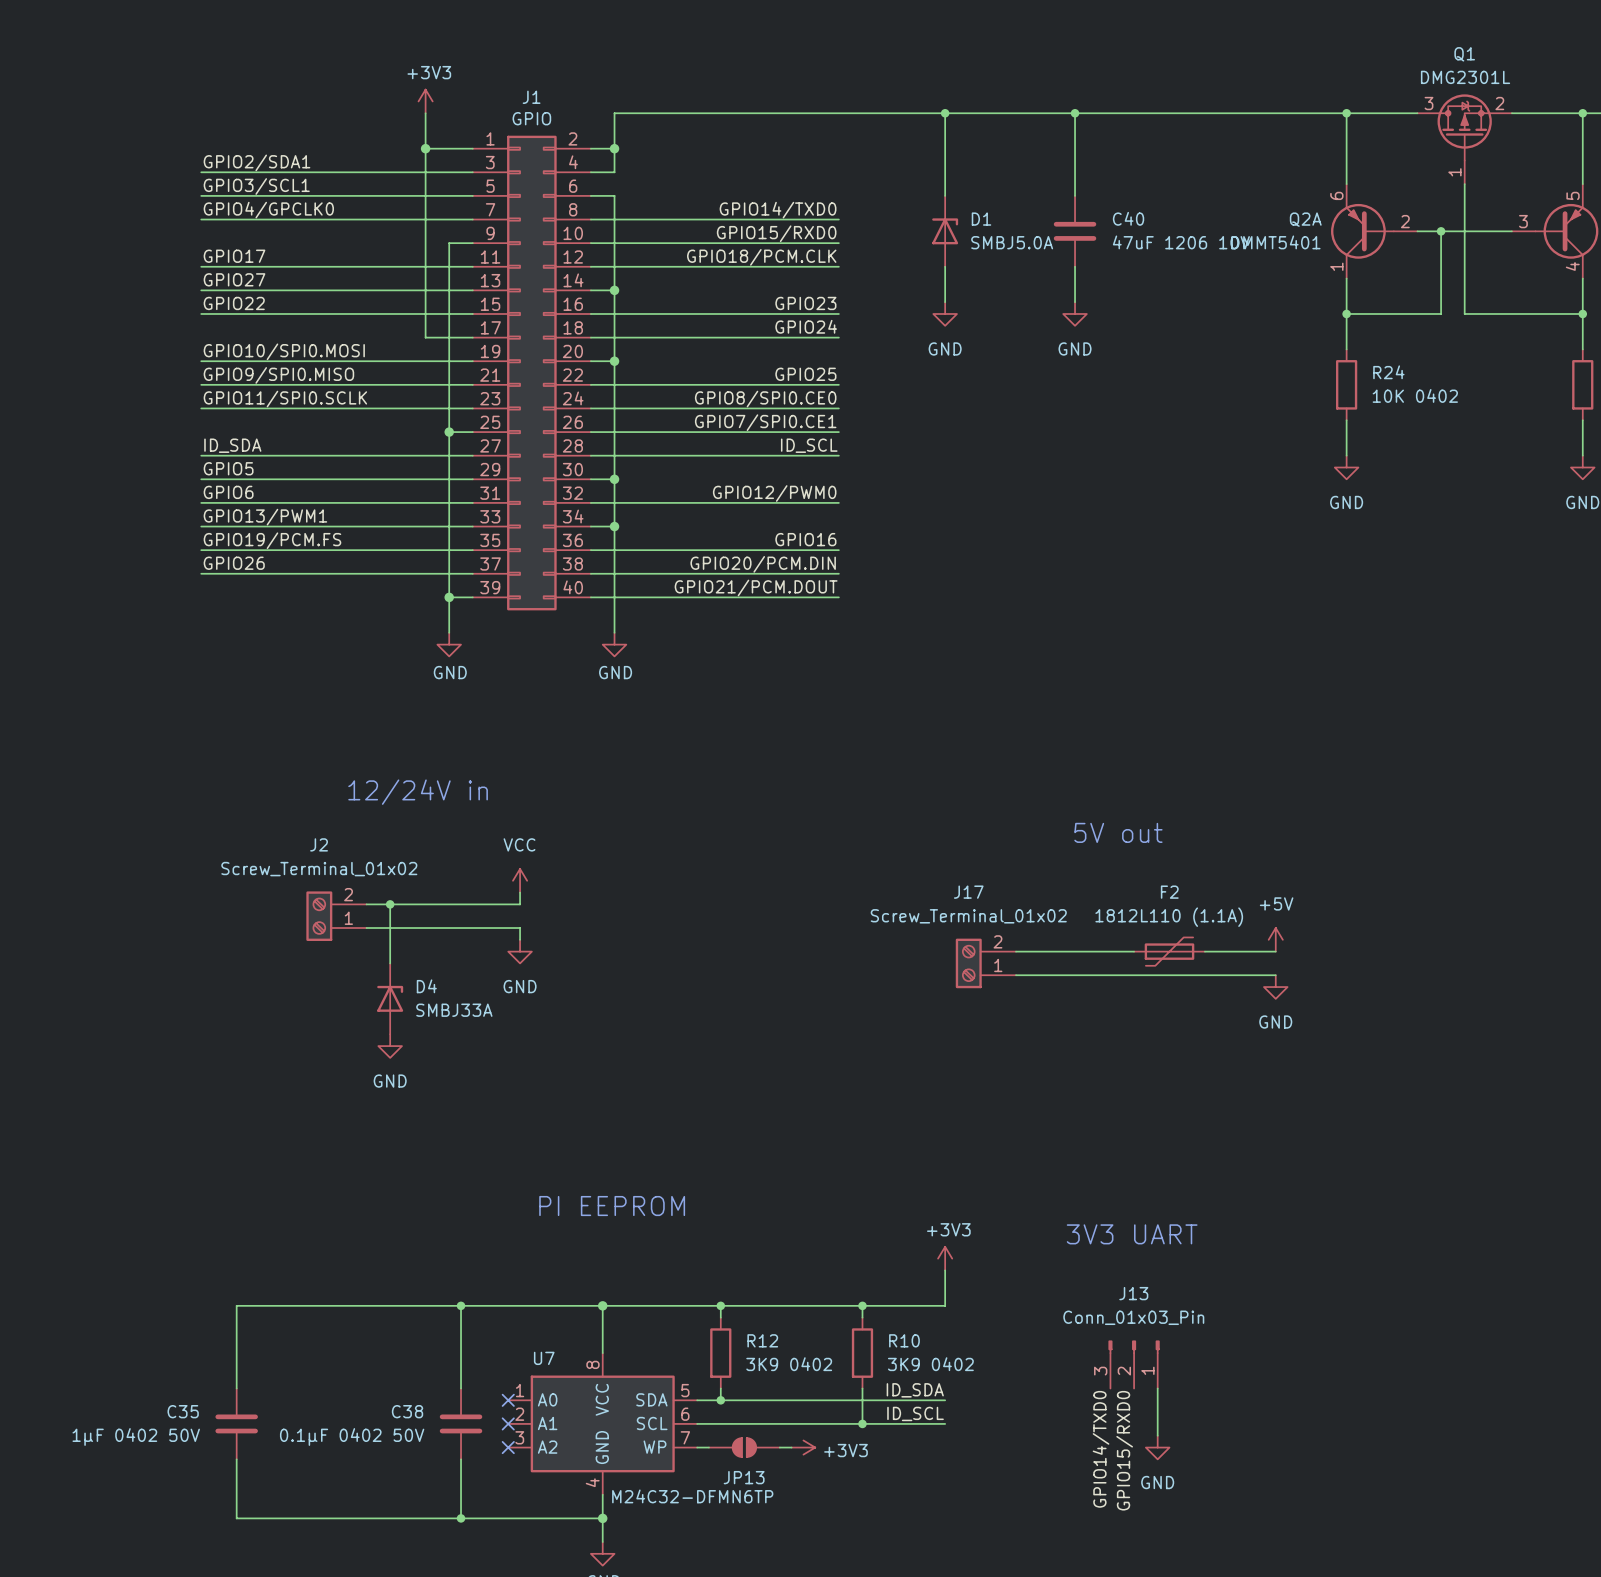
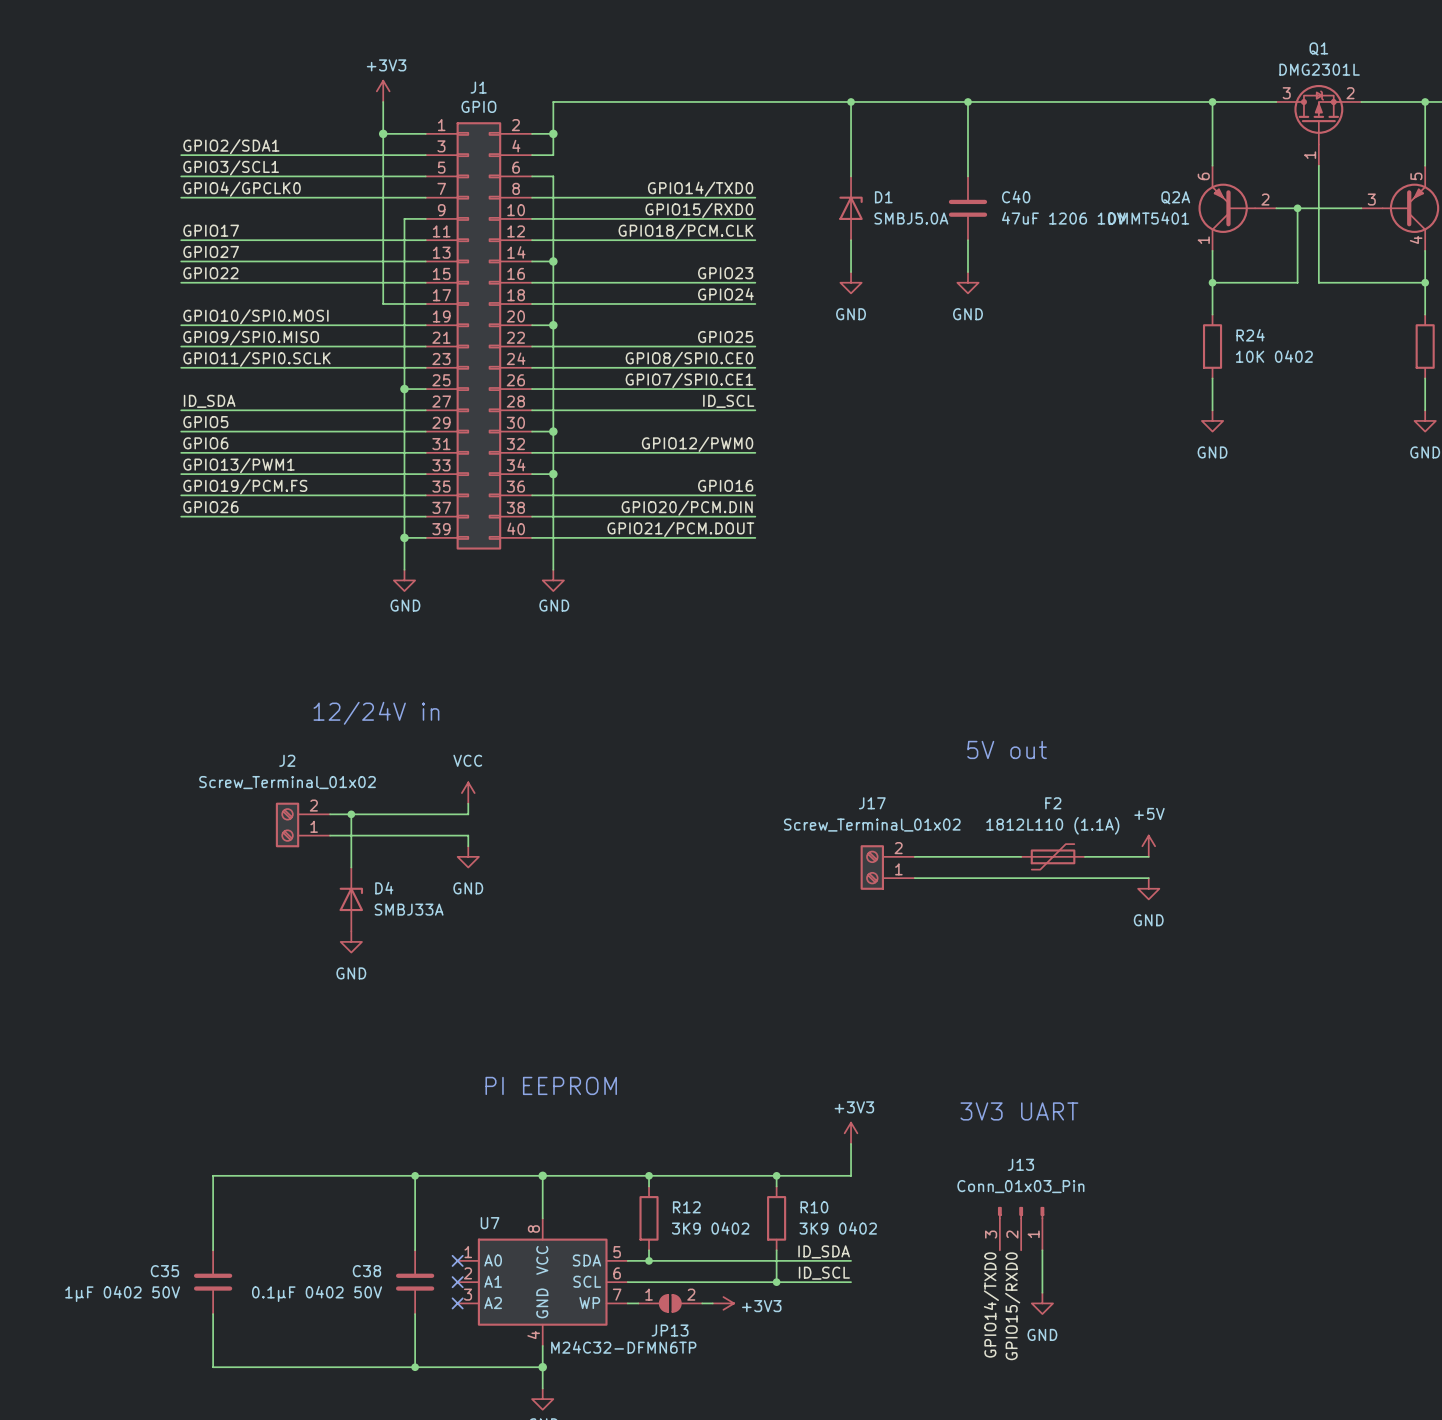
JP13 pin number: none -> 1 (649, 1294)
JP13 pin number: none -> 2 (691, 1294)

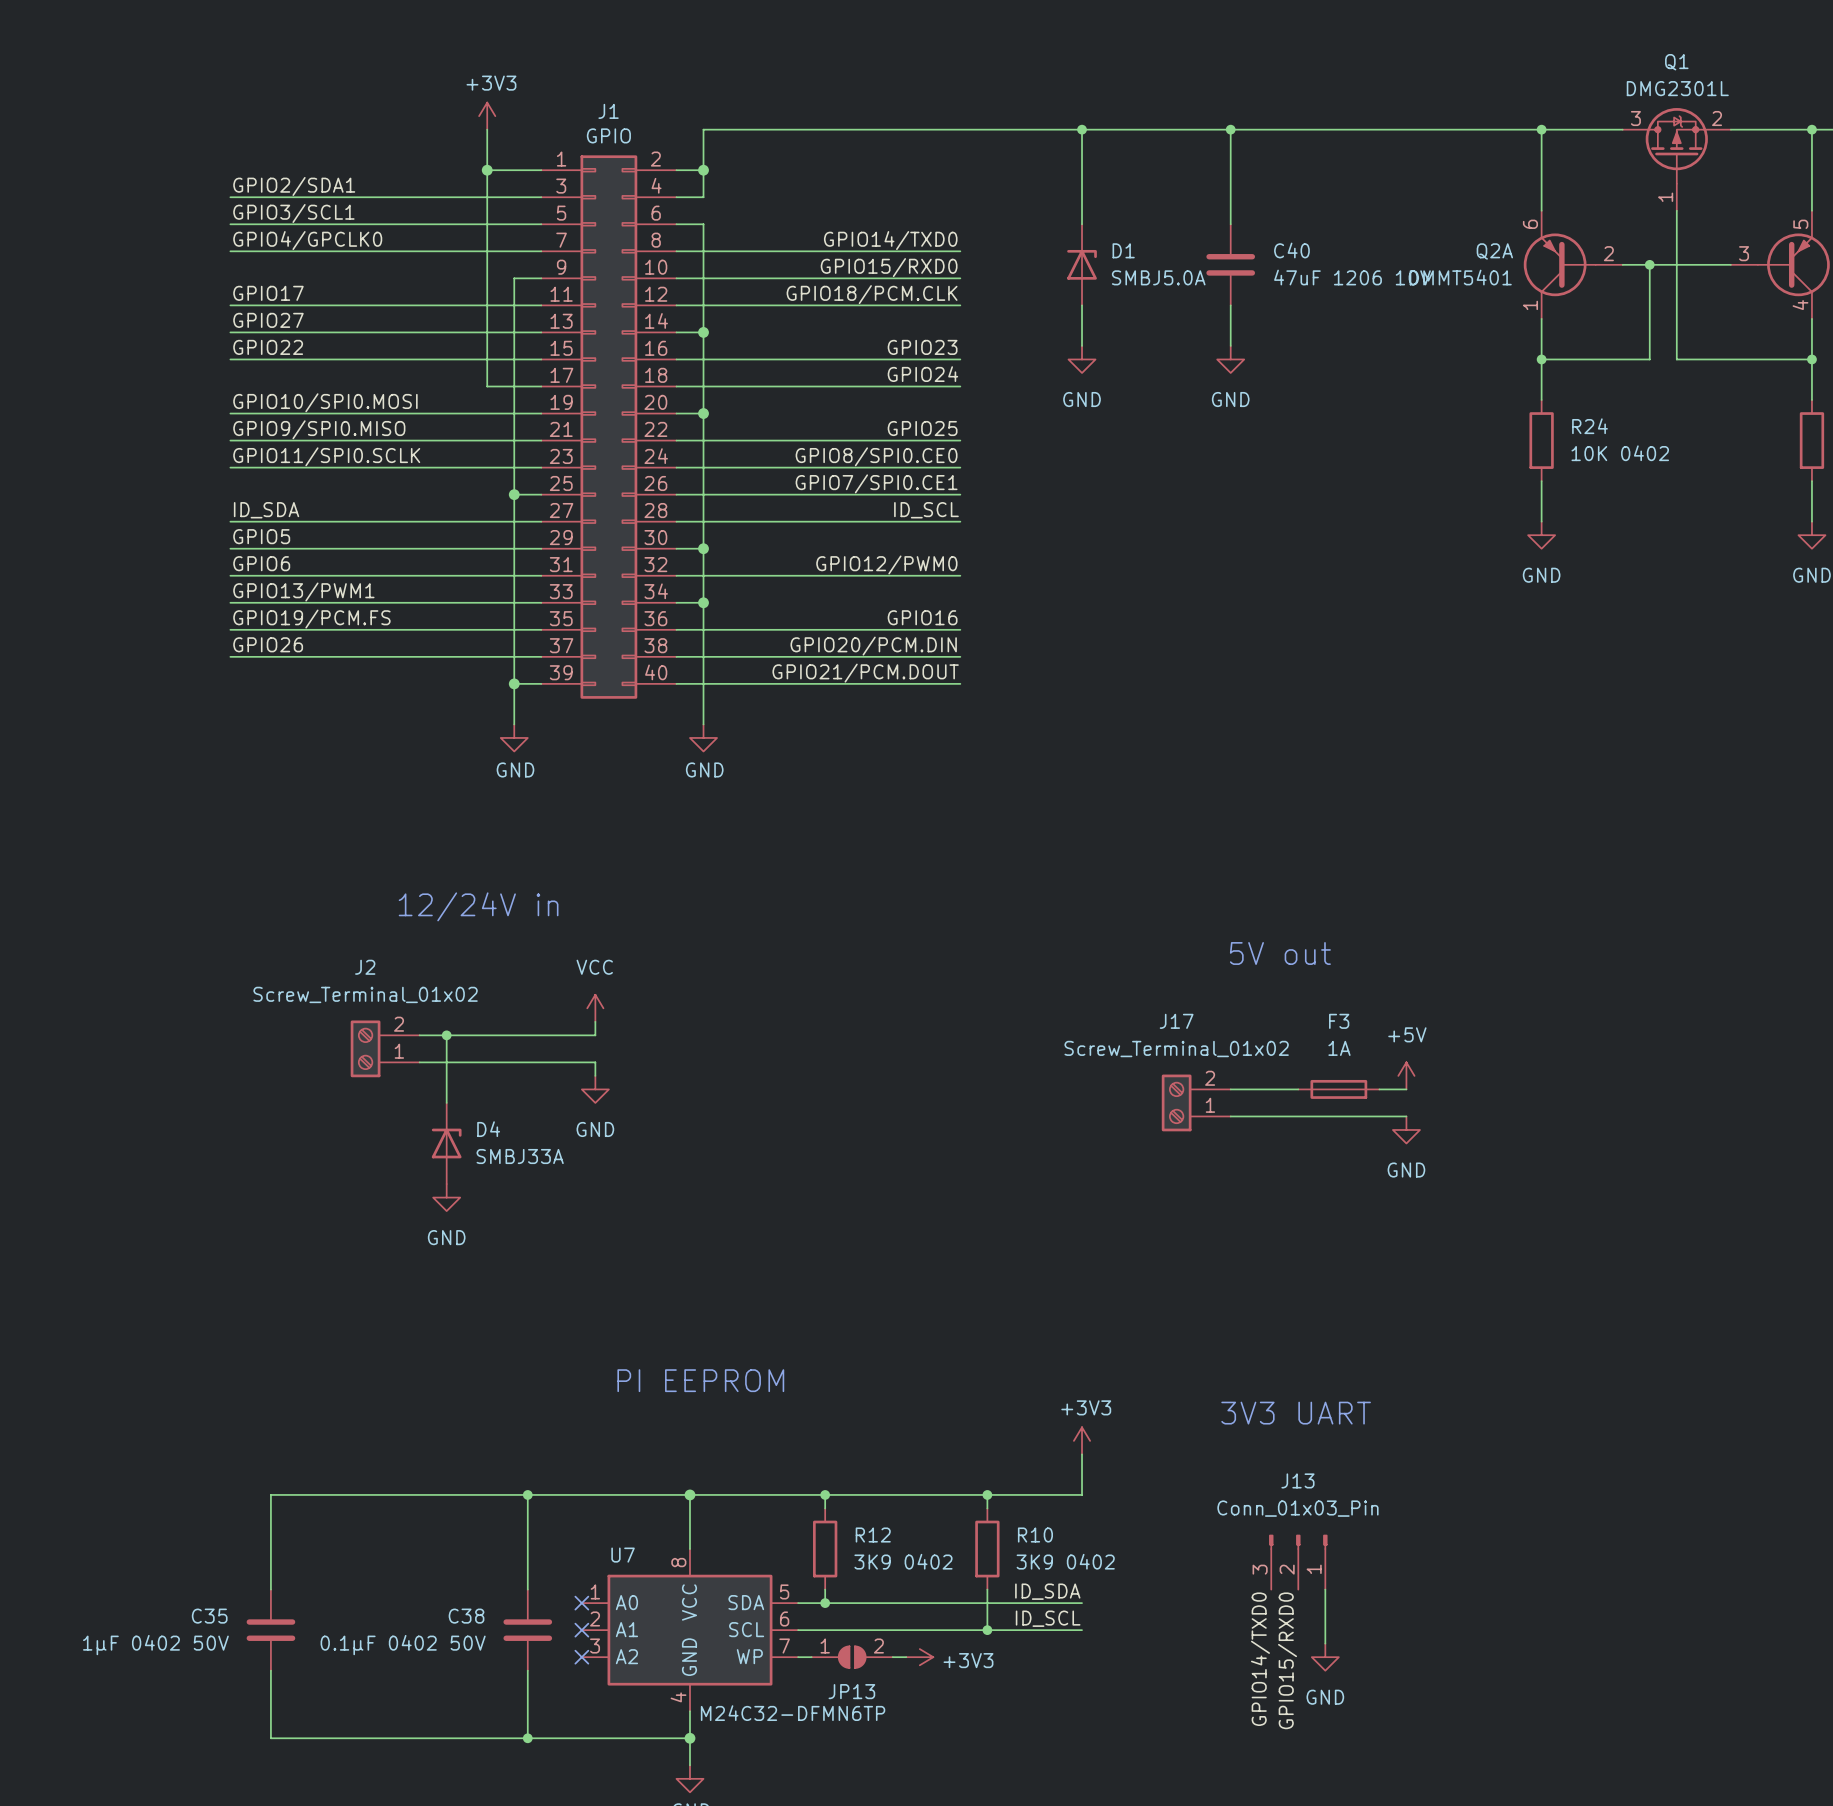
power symbol position: +5V (1148, 846) -> +5V (1406, 1075)
F2: 1812L110 (1.1A) (1053, 856) -> none
F3: none -> 1A (1338, 1089)
wire: (1106, 856) (1148, 856) -> none
J17 position: (887, 867) -> (1196, 1102)
wire: (1106, 878) (1148, 878) -> none
power symbol position: GND (1148, 888) -> GND (1406, 1129)

